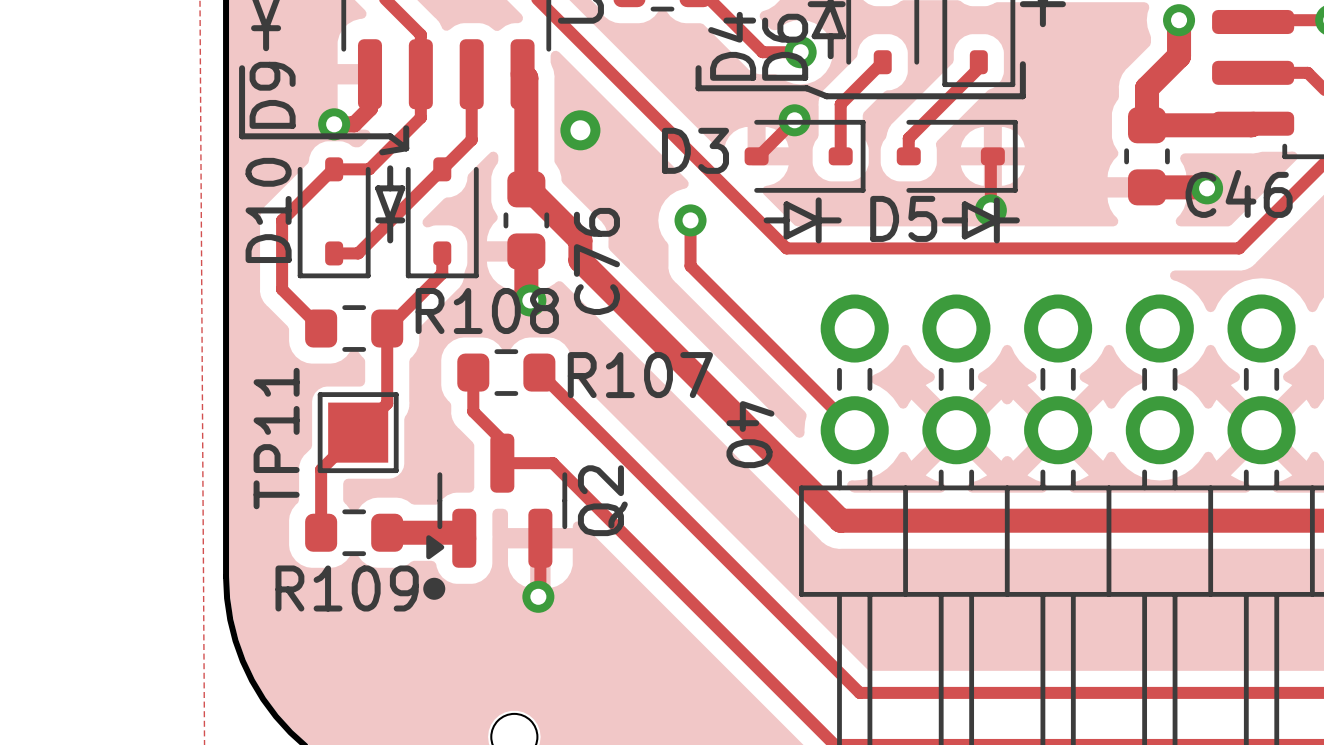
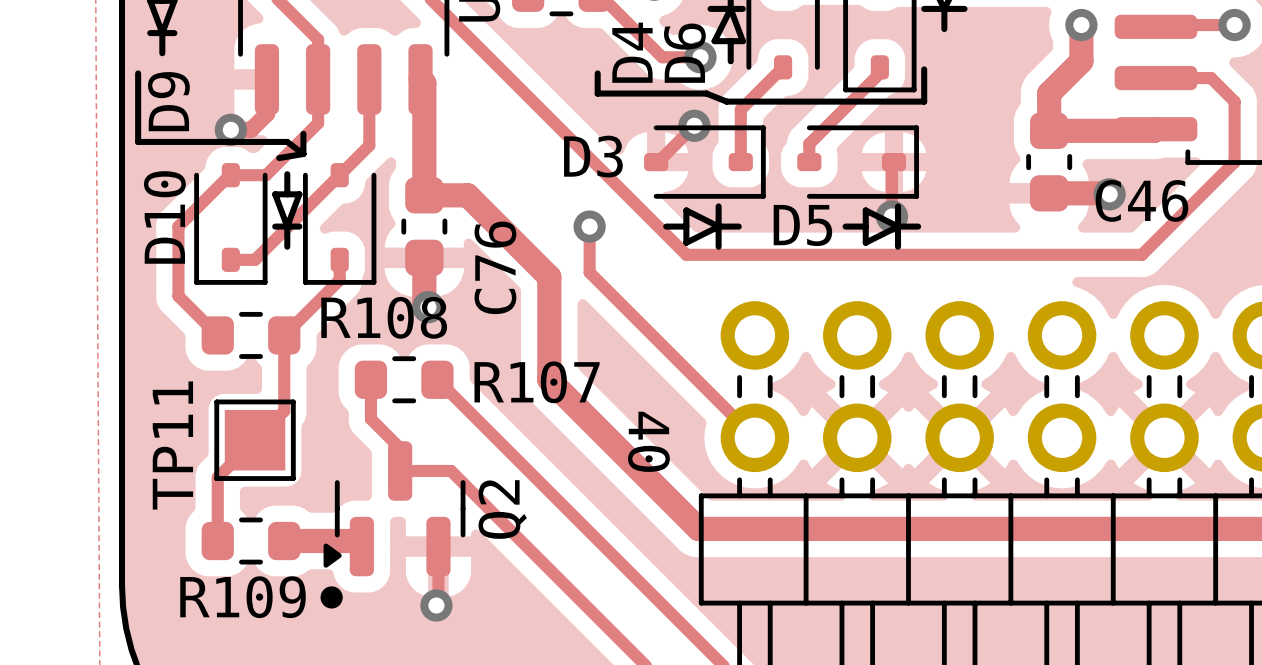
via: (580, 130) -> none
track: (529, 189) (580, 240) (580, 260) (840, 520) -> (427, 195) (467, 195) (549, 276) (549, 379) (698, 528) (740, 528)

